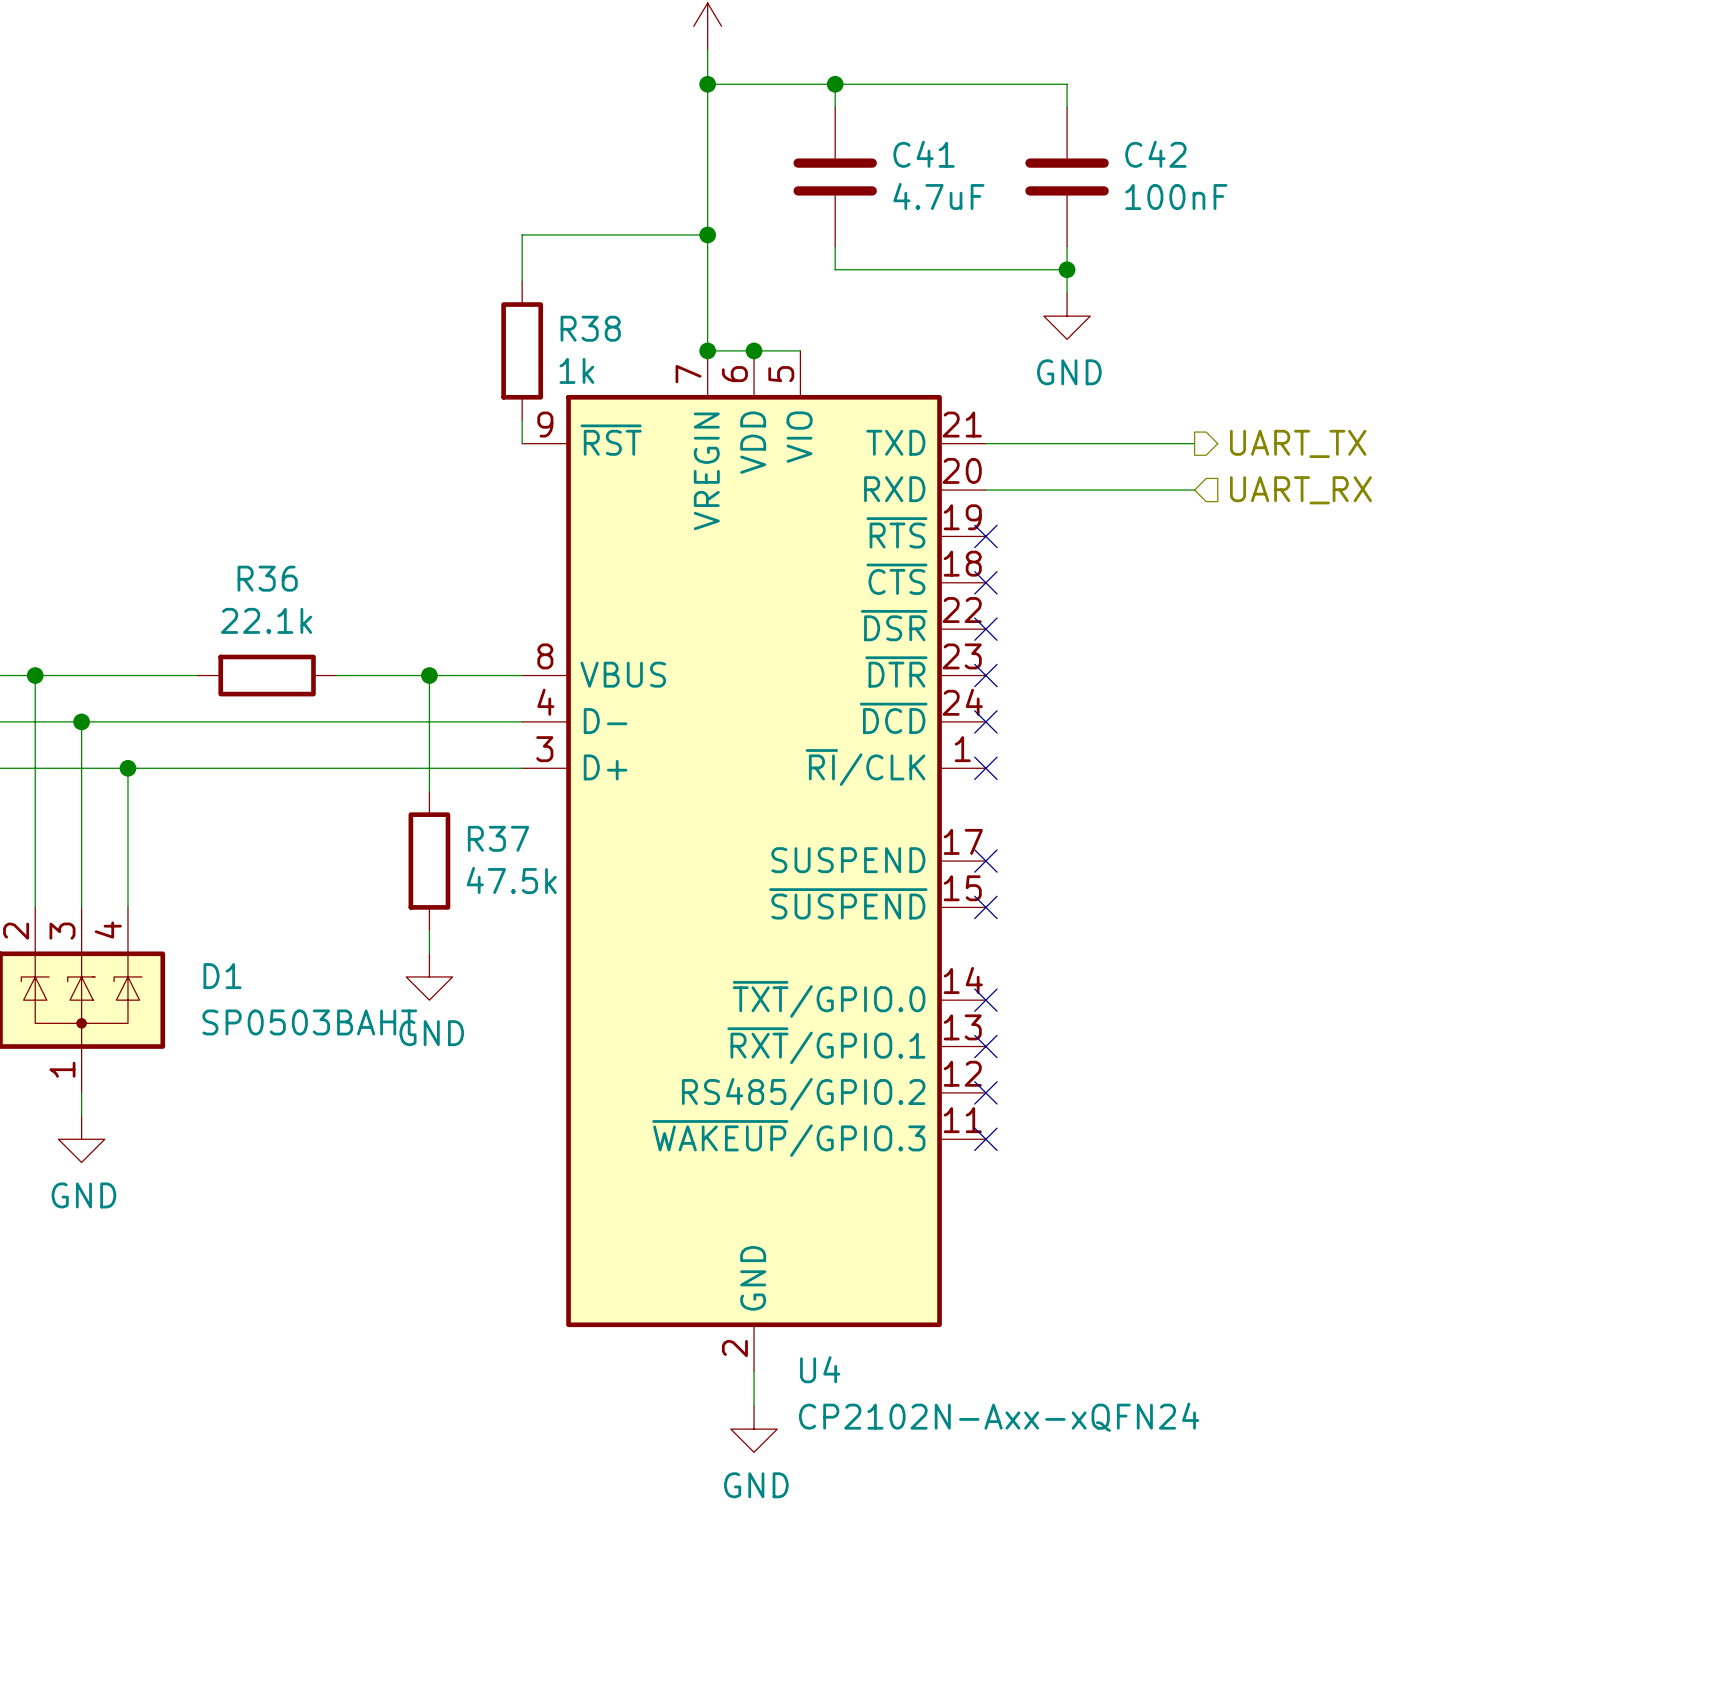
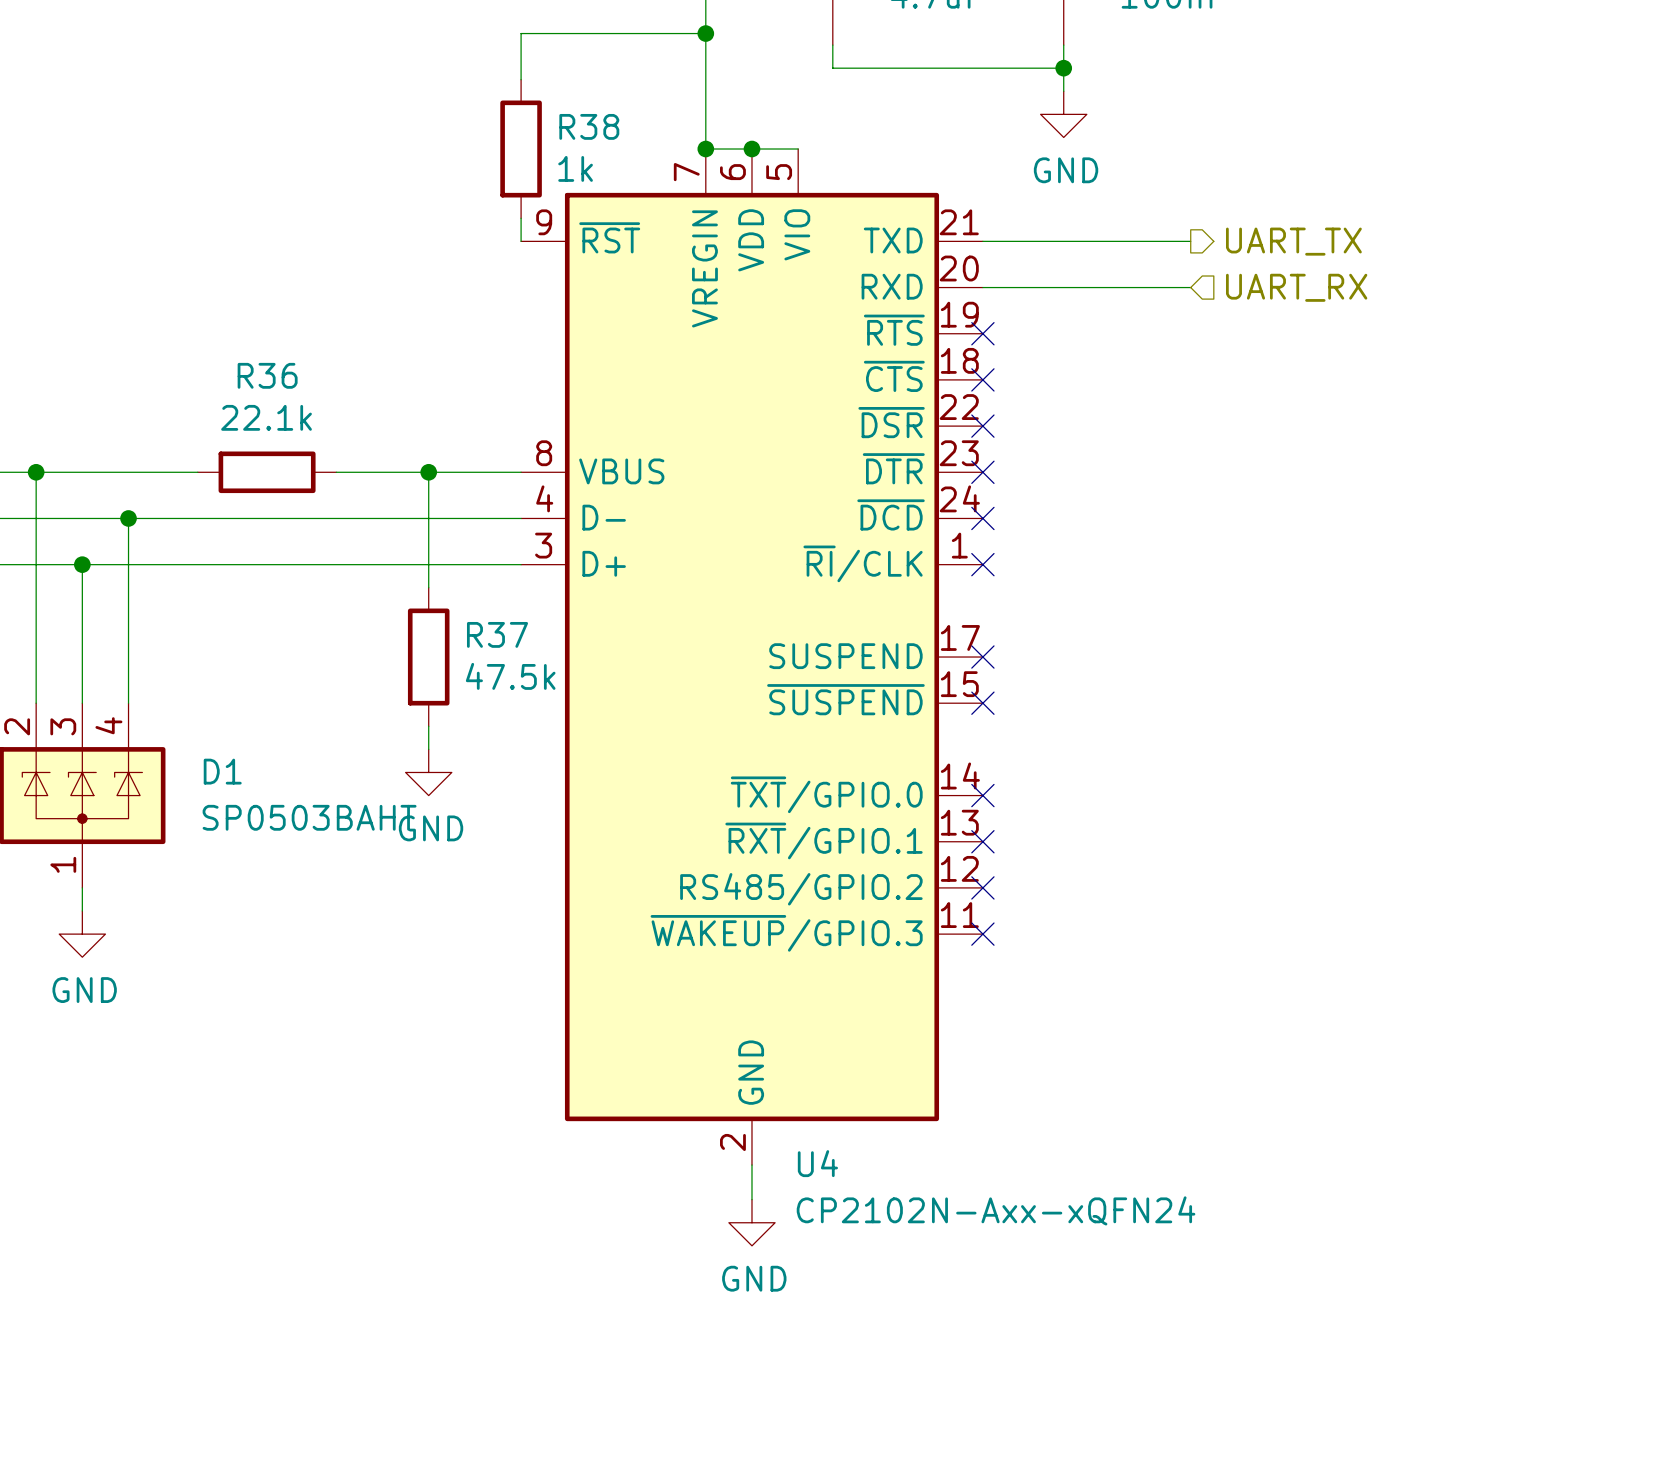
wire: (81, 721) (81, 768) -> (128, 518) (128, 564)
junction: (81, 721) -> none
junction: none -> (128, 518)
junction: none -> (82, 564)
junction: (127, 768) -> none

